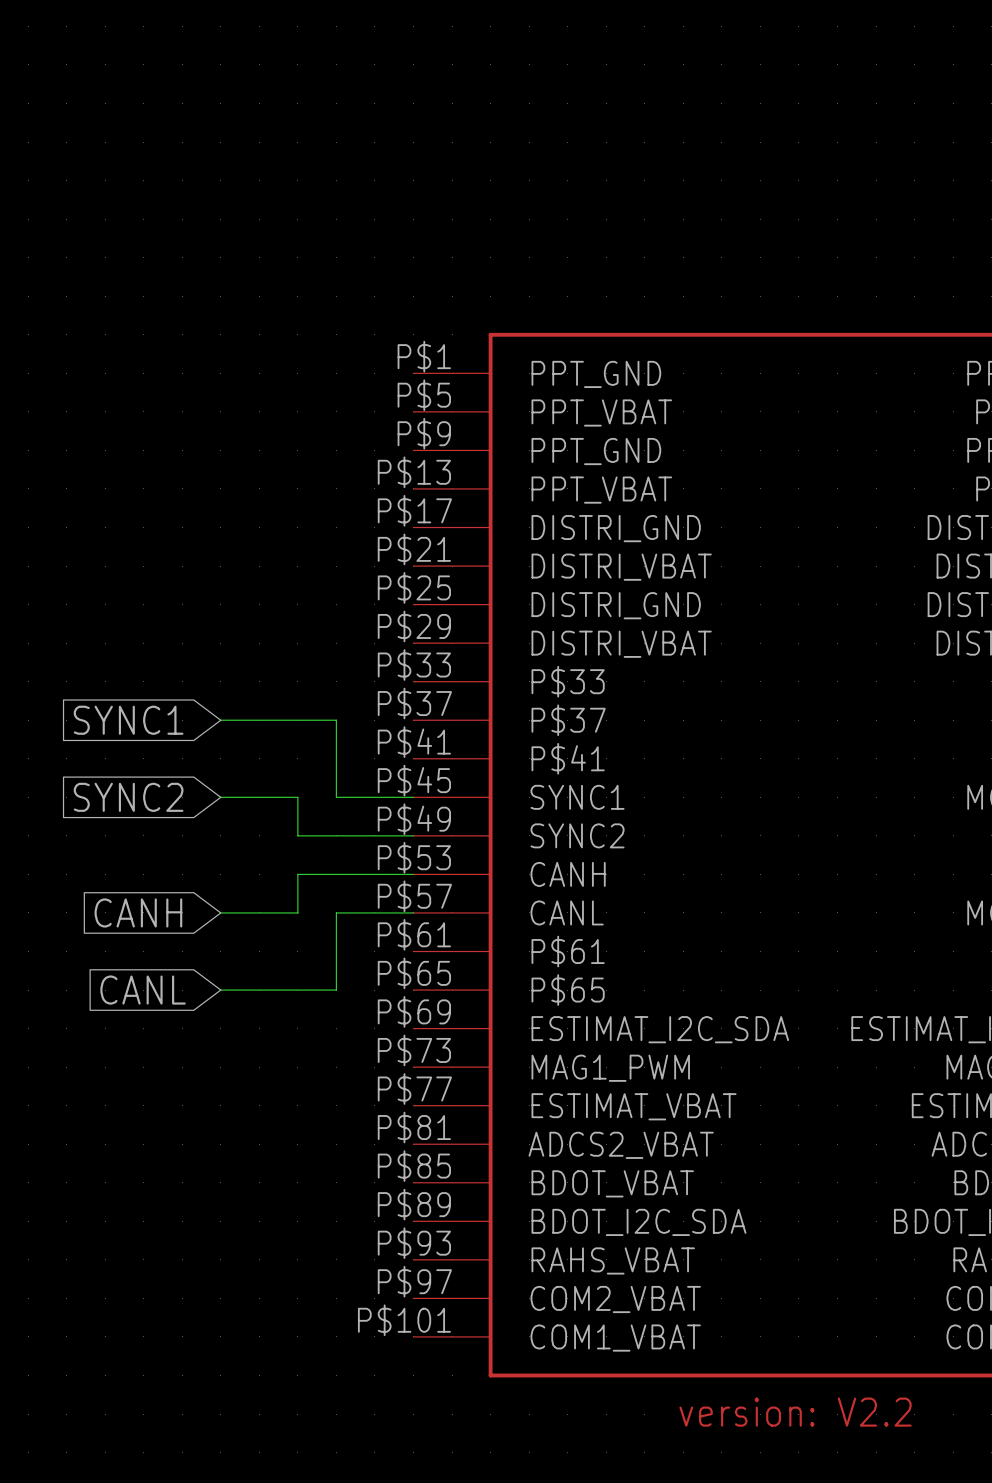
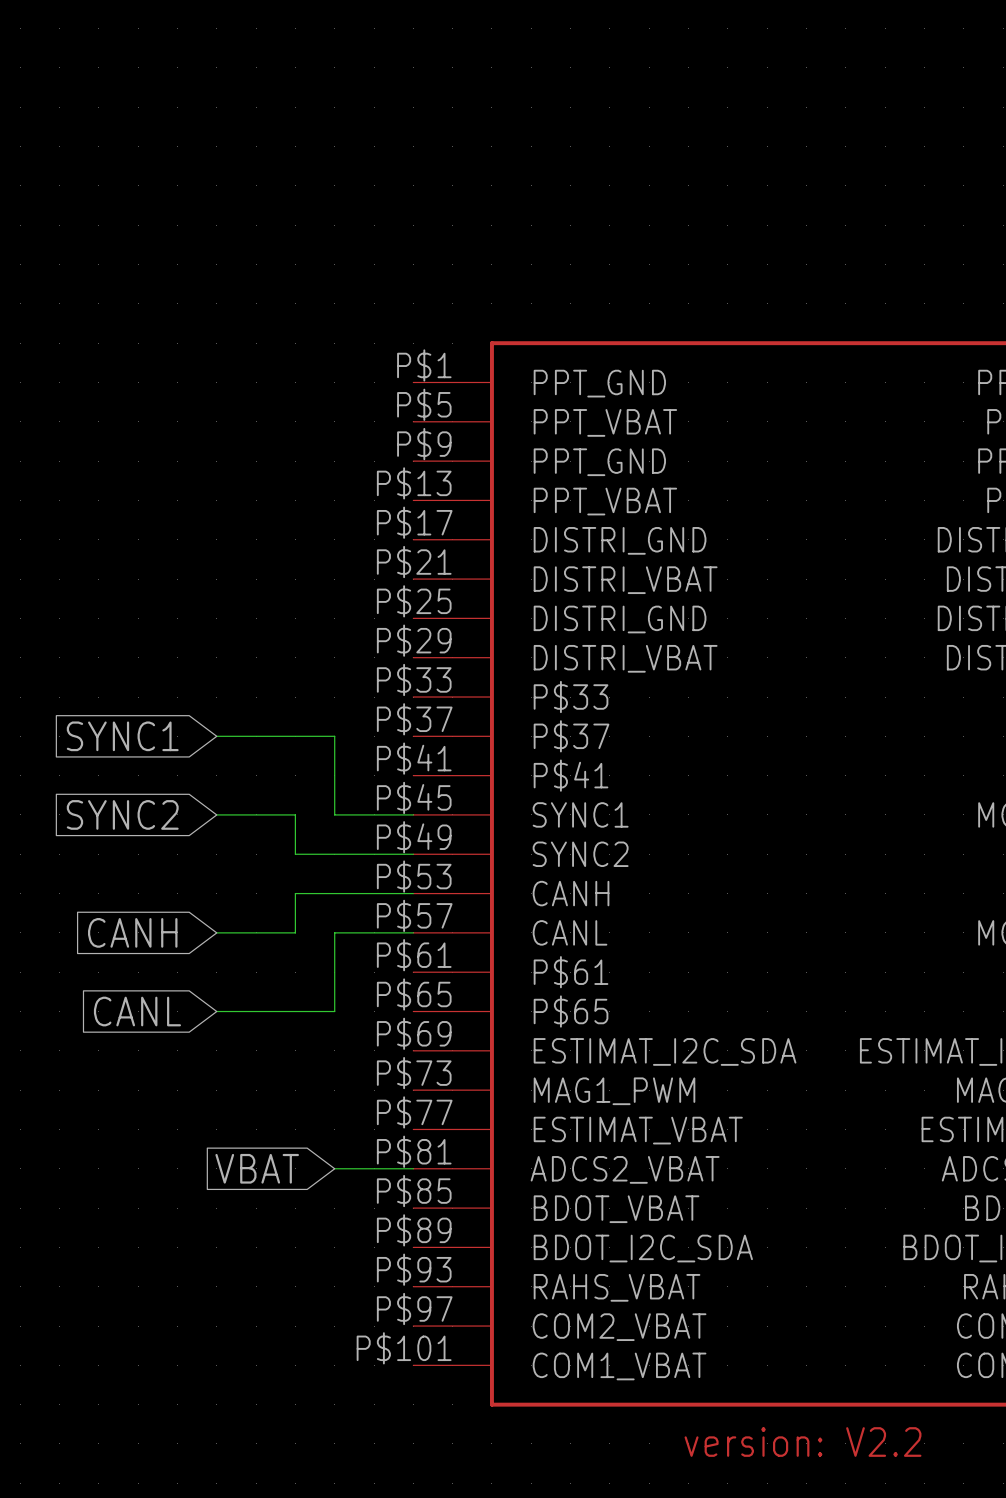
global label: none -> VBAT (257, 1168)
wire: none -> (334, 1168) (413, 1168)

